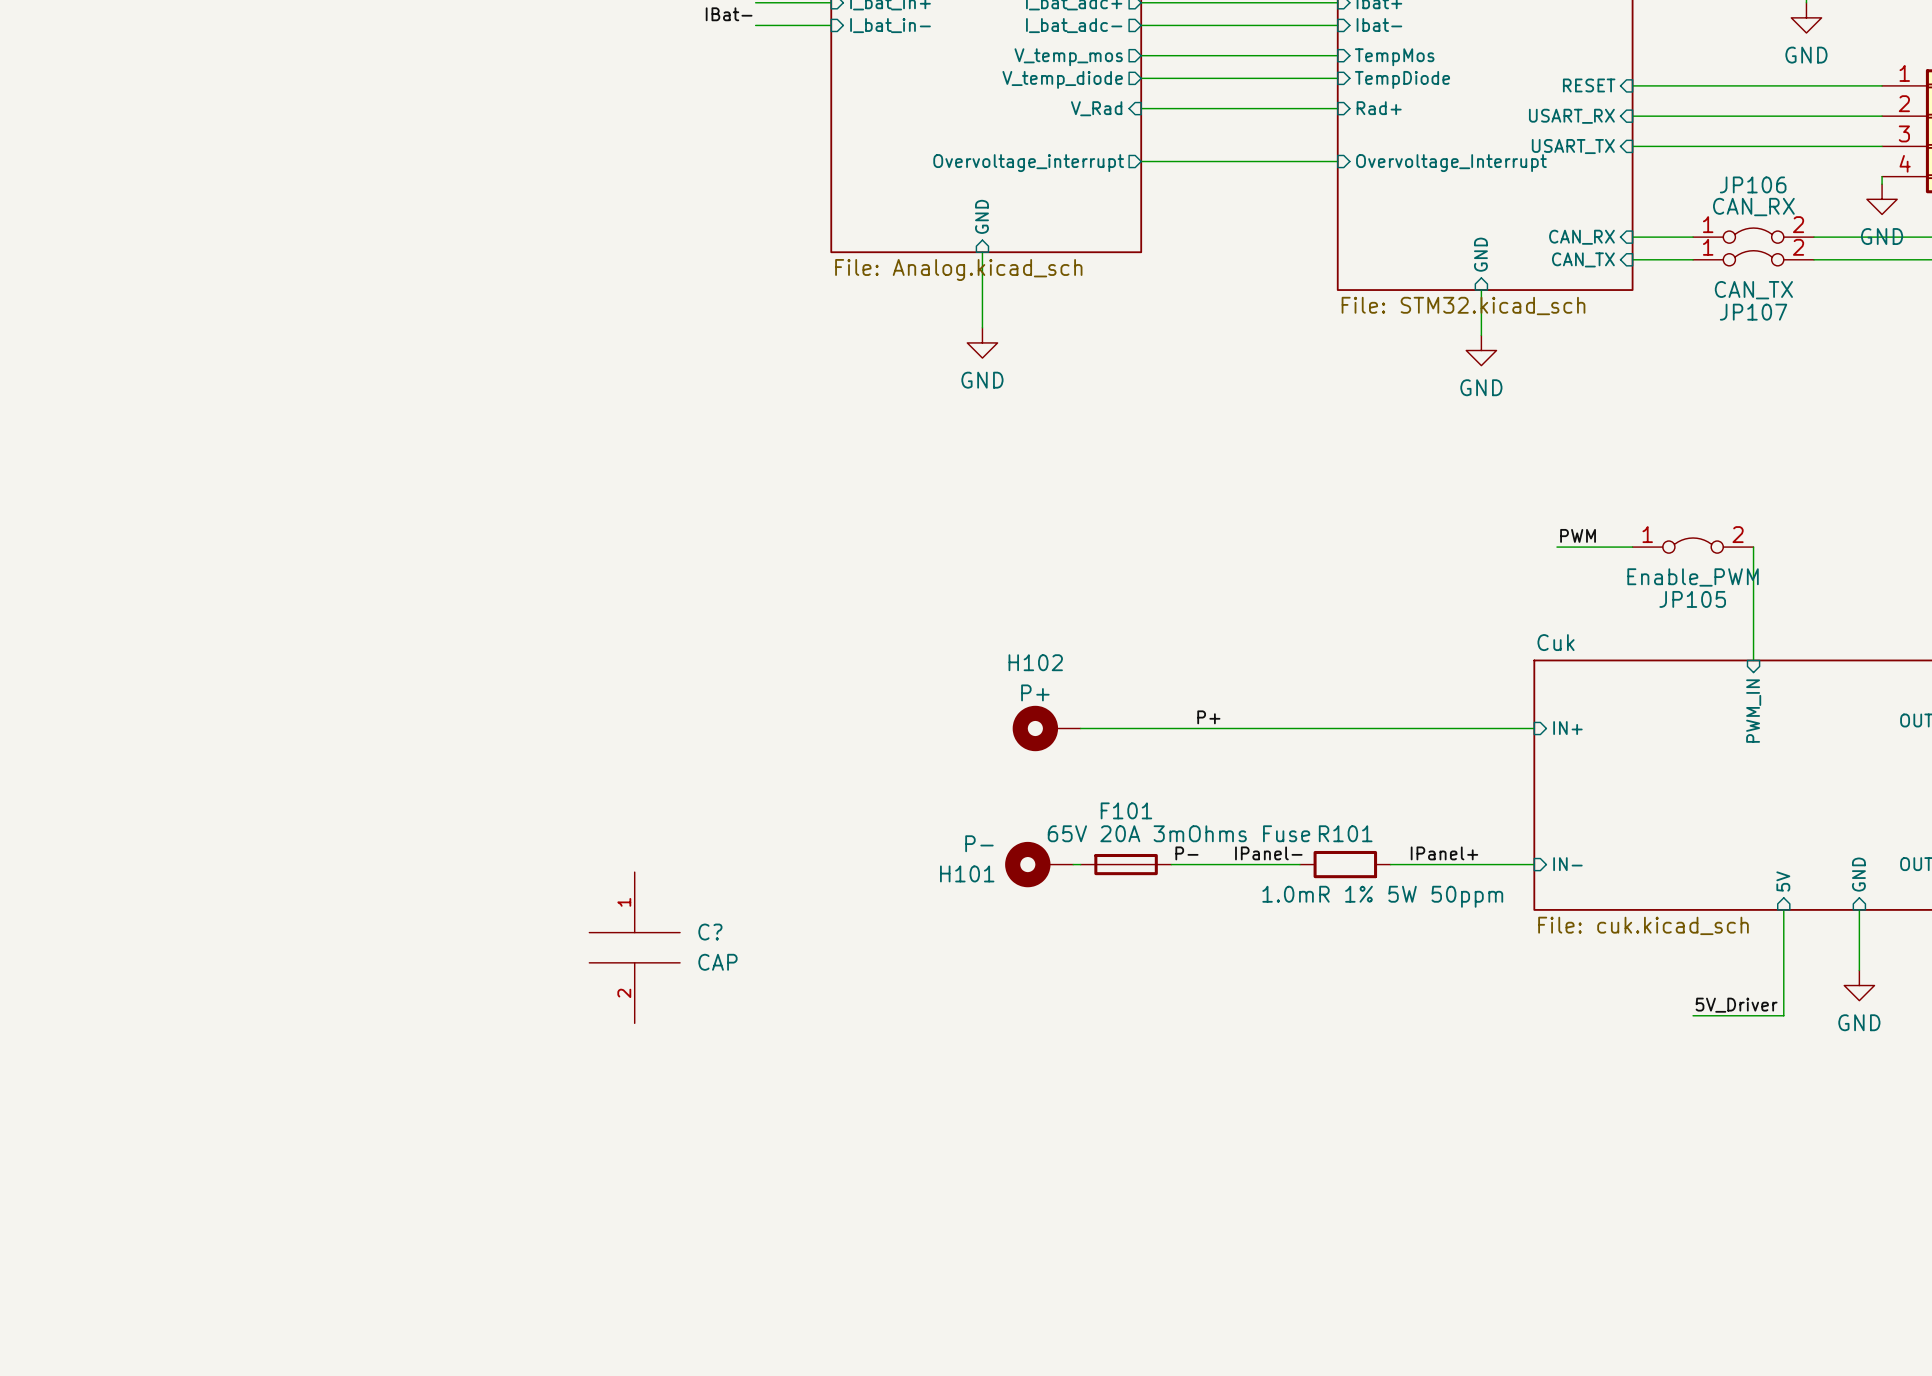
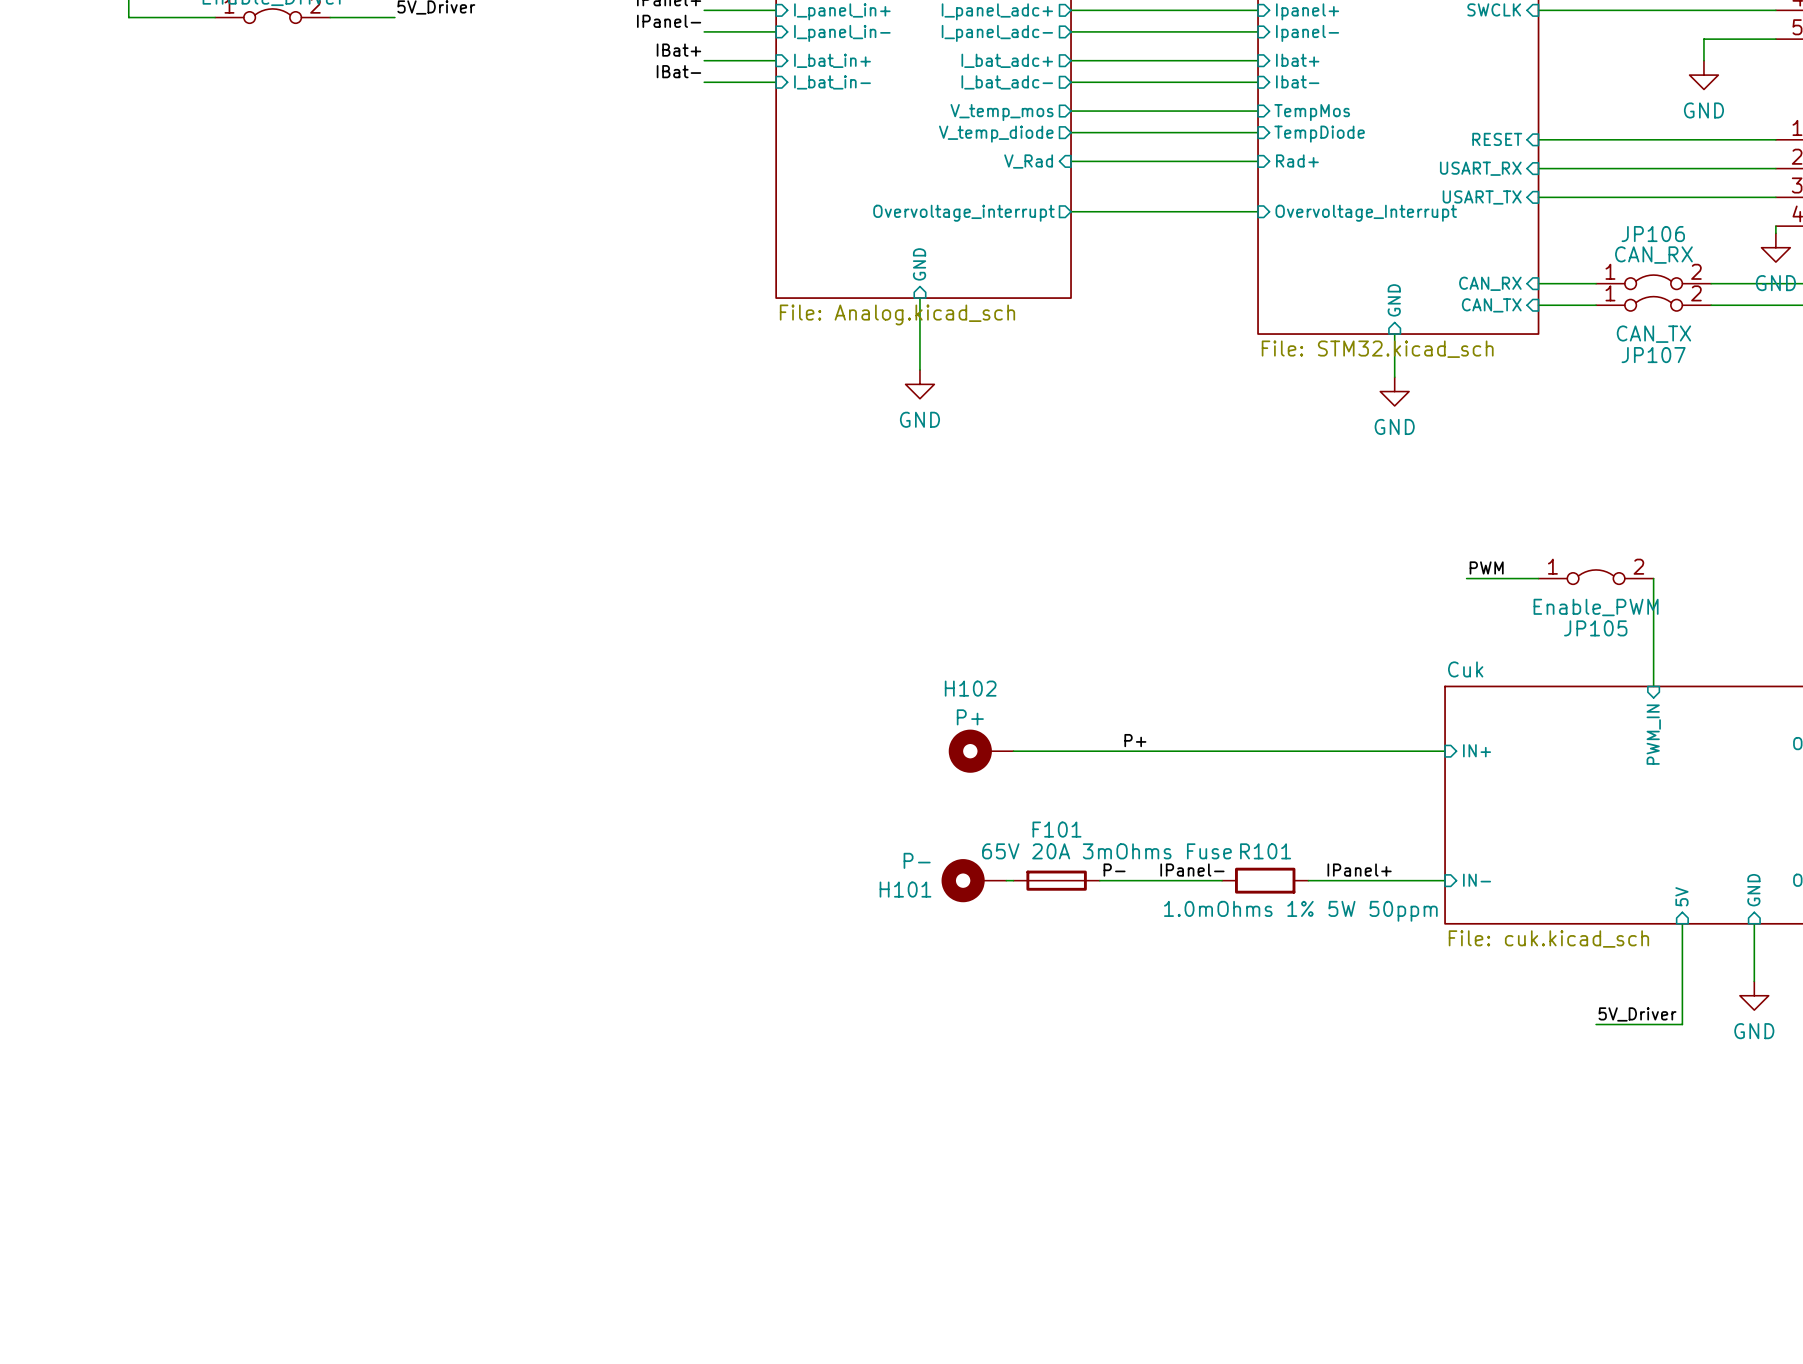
R101 value: 1.0mR 1% 5W 50ppm (1382, 896) -> 1.0mOhms 1% 5W 50ppm (1300, 911)
C?: CAP (634, 947) -> none

